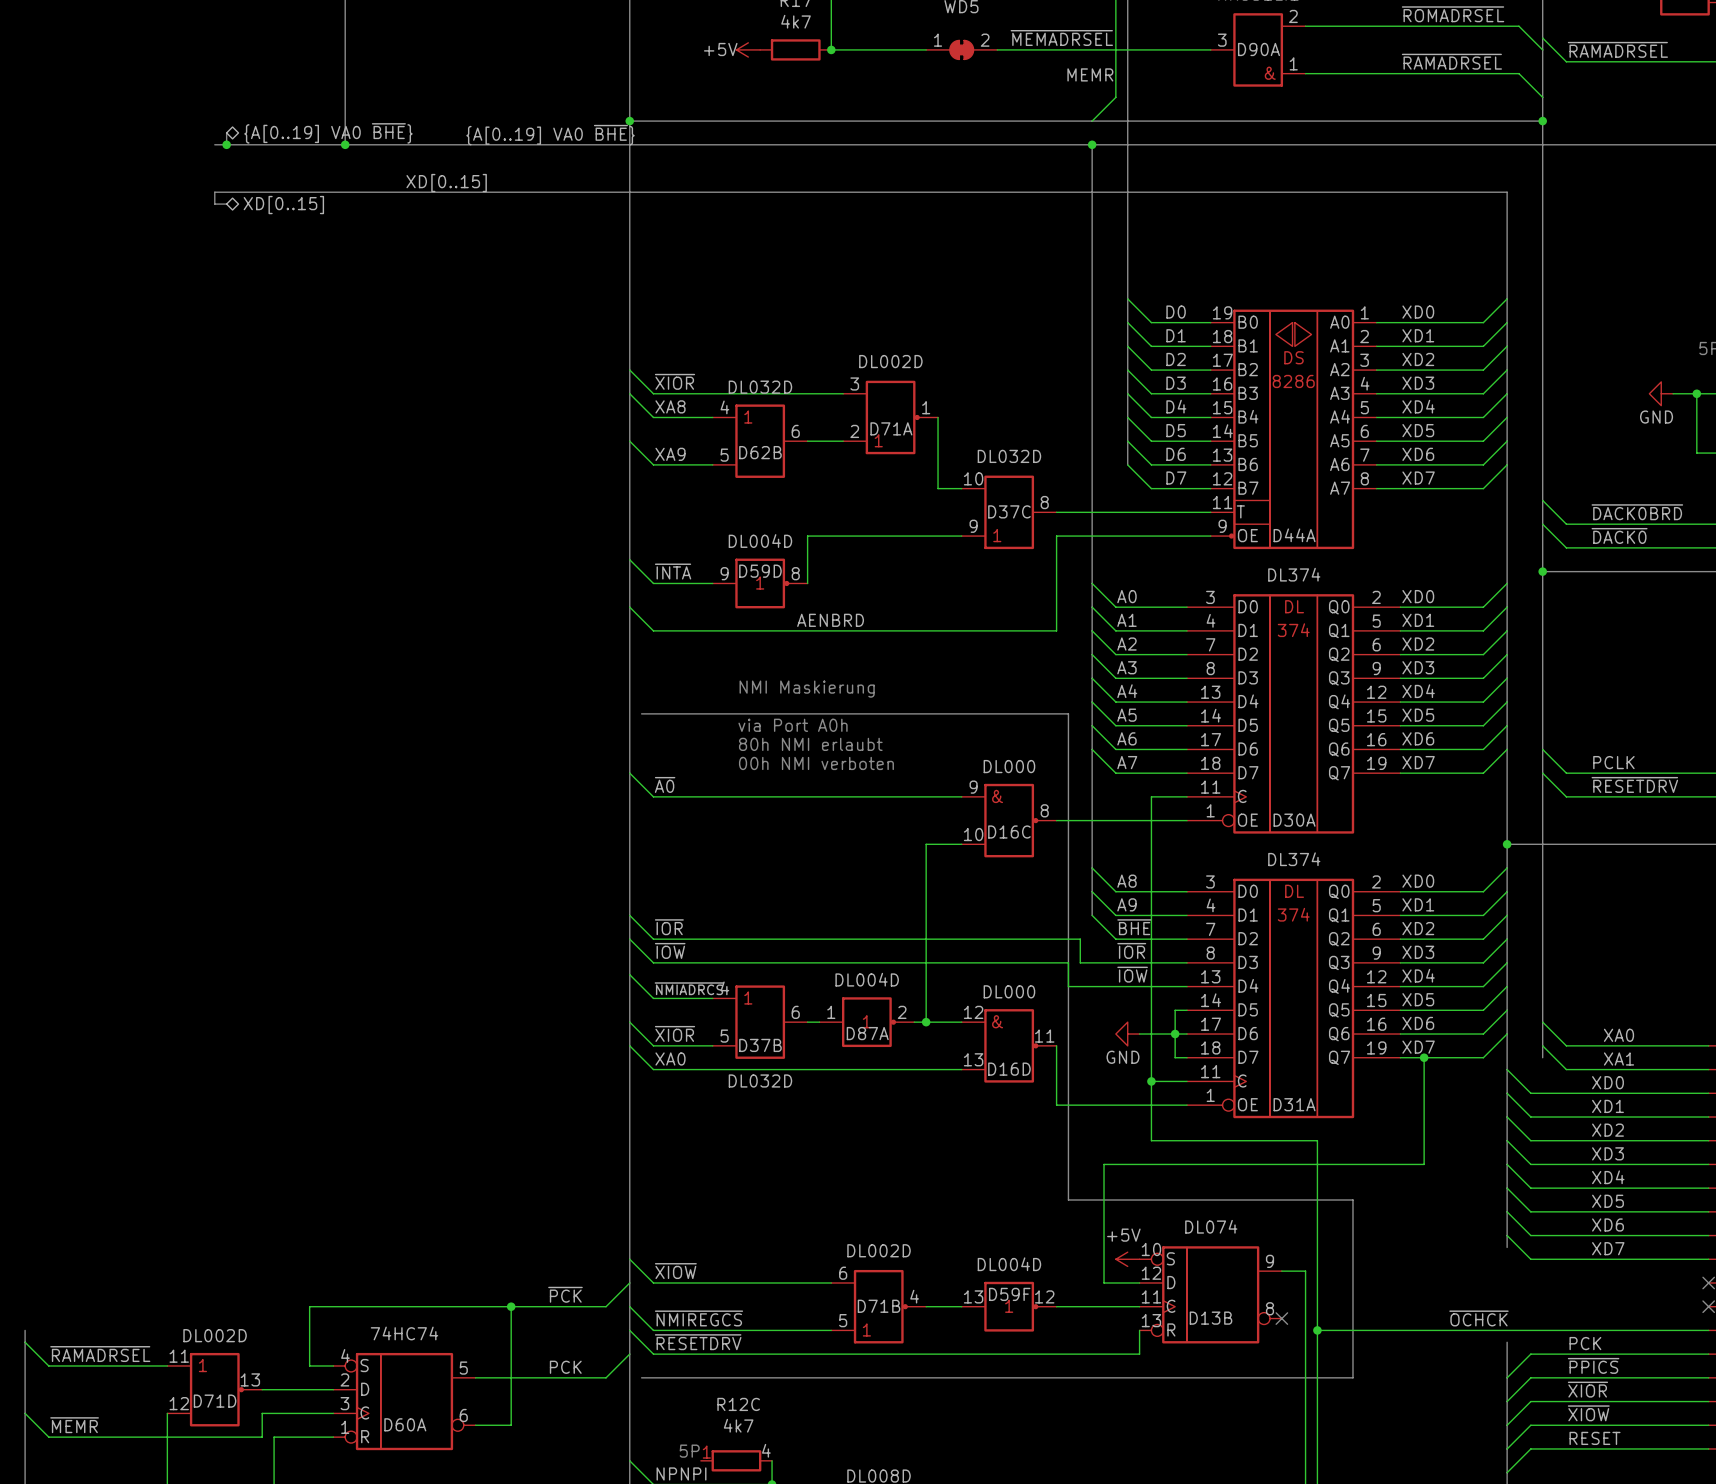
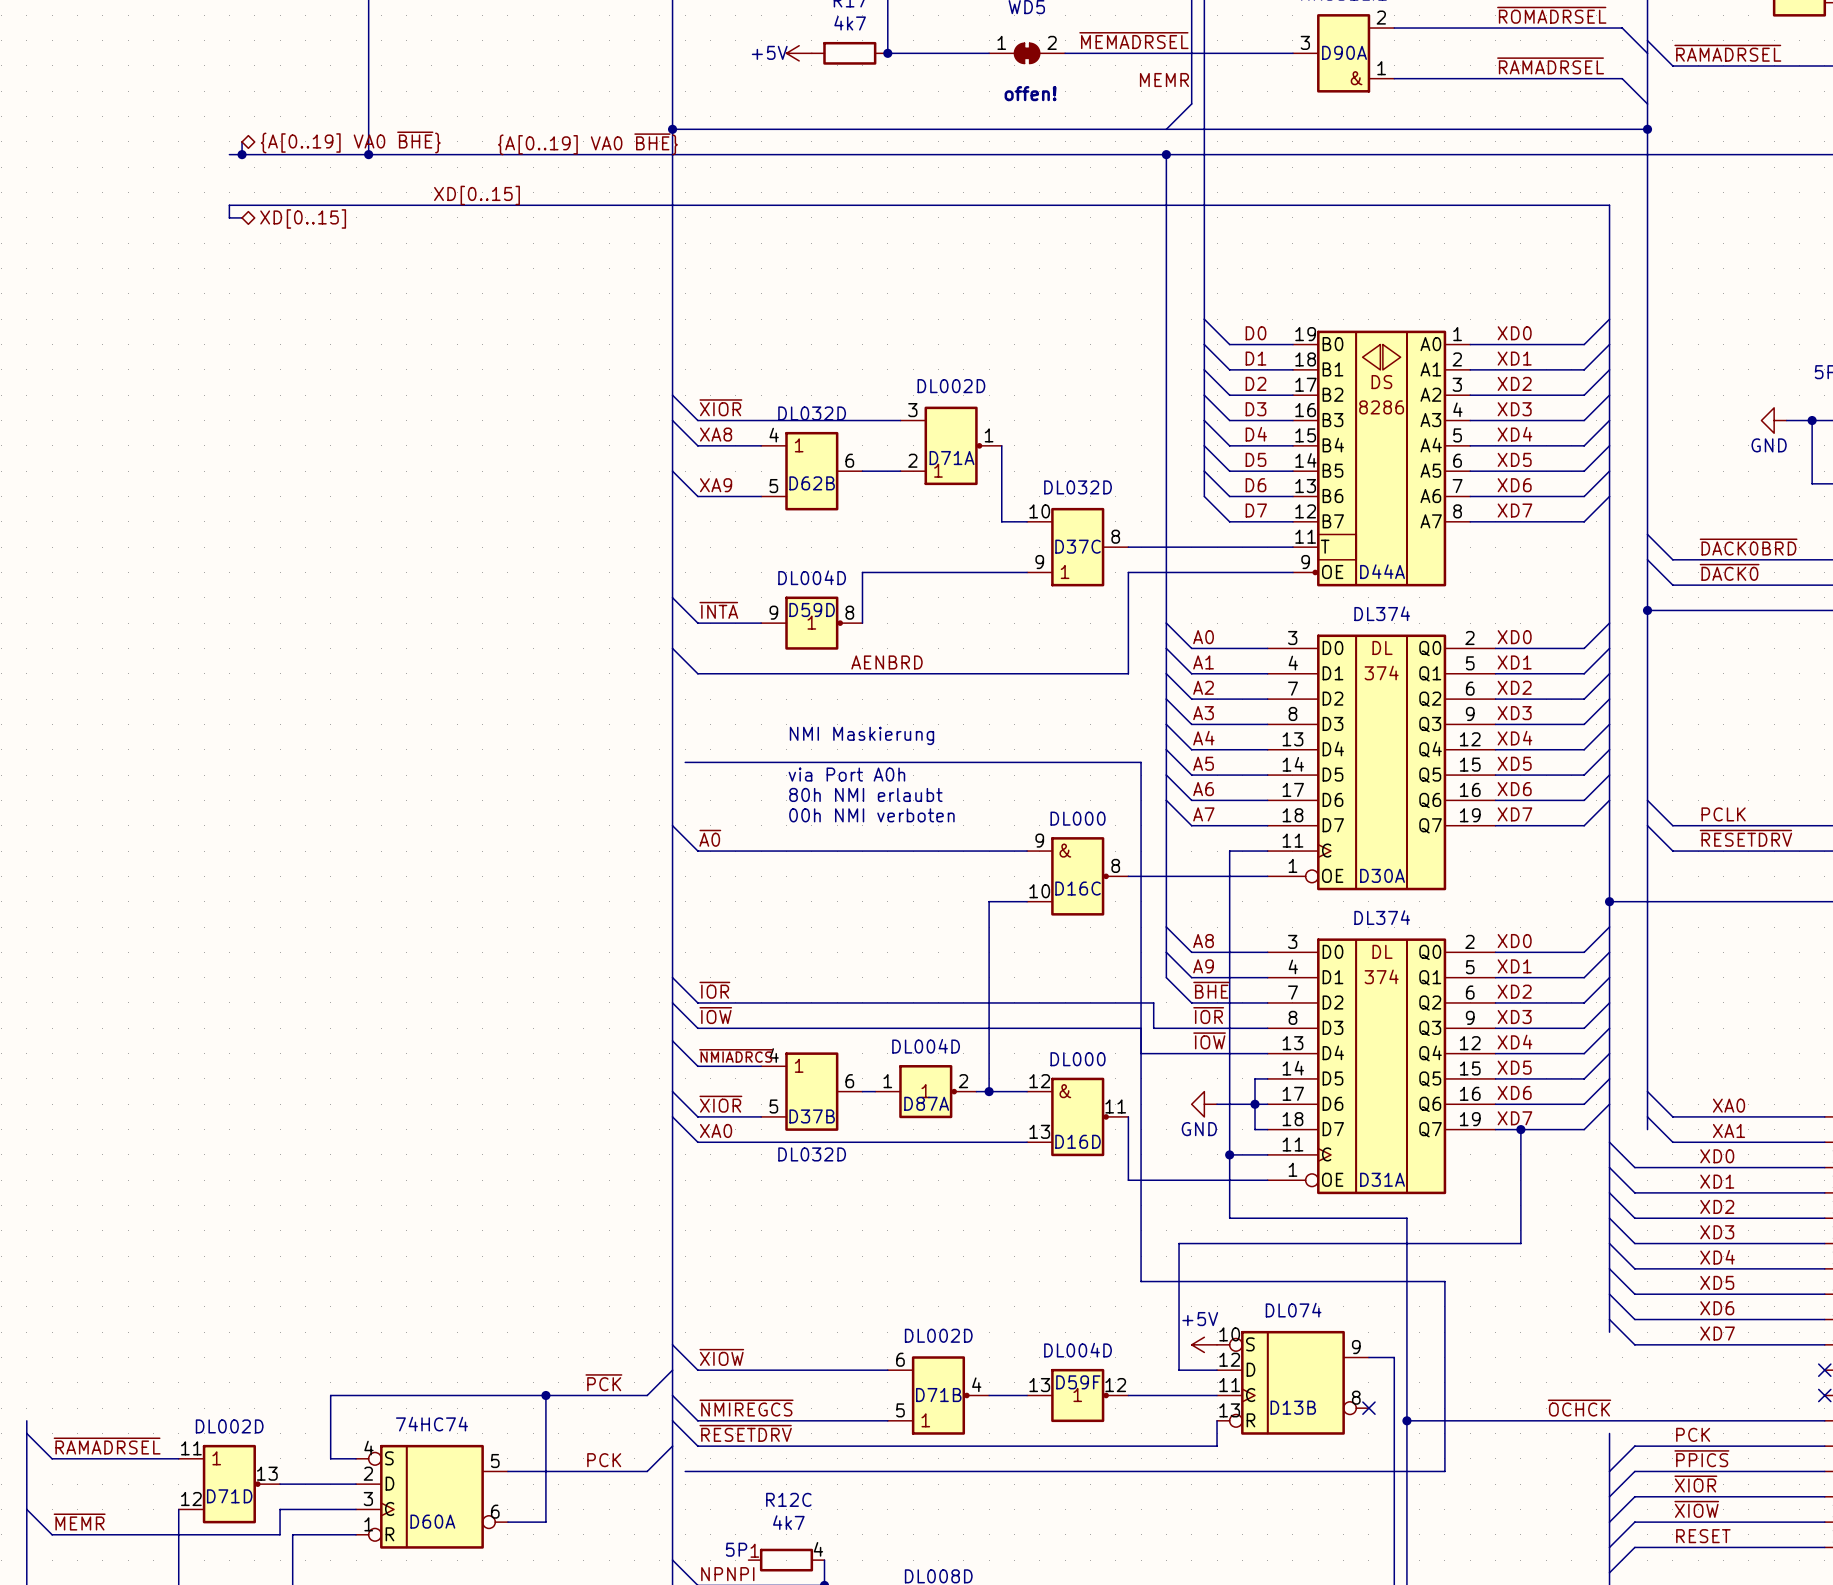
text: none -> offen! (1030, 93)

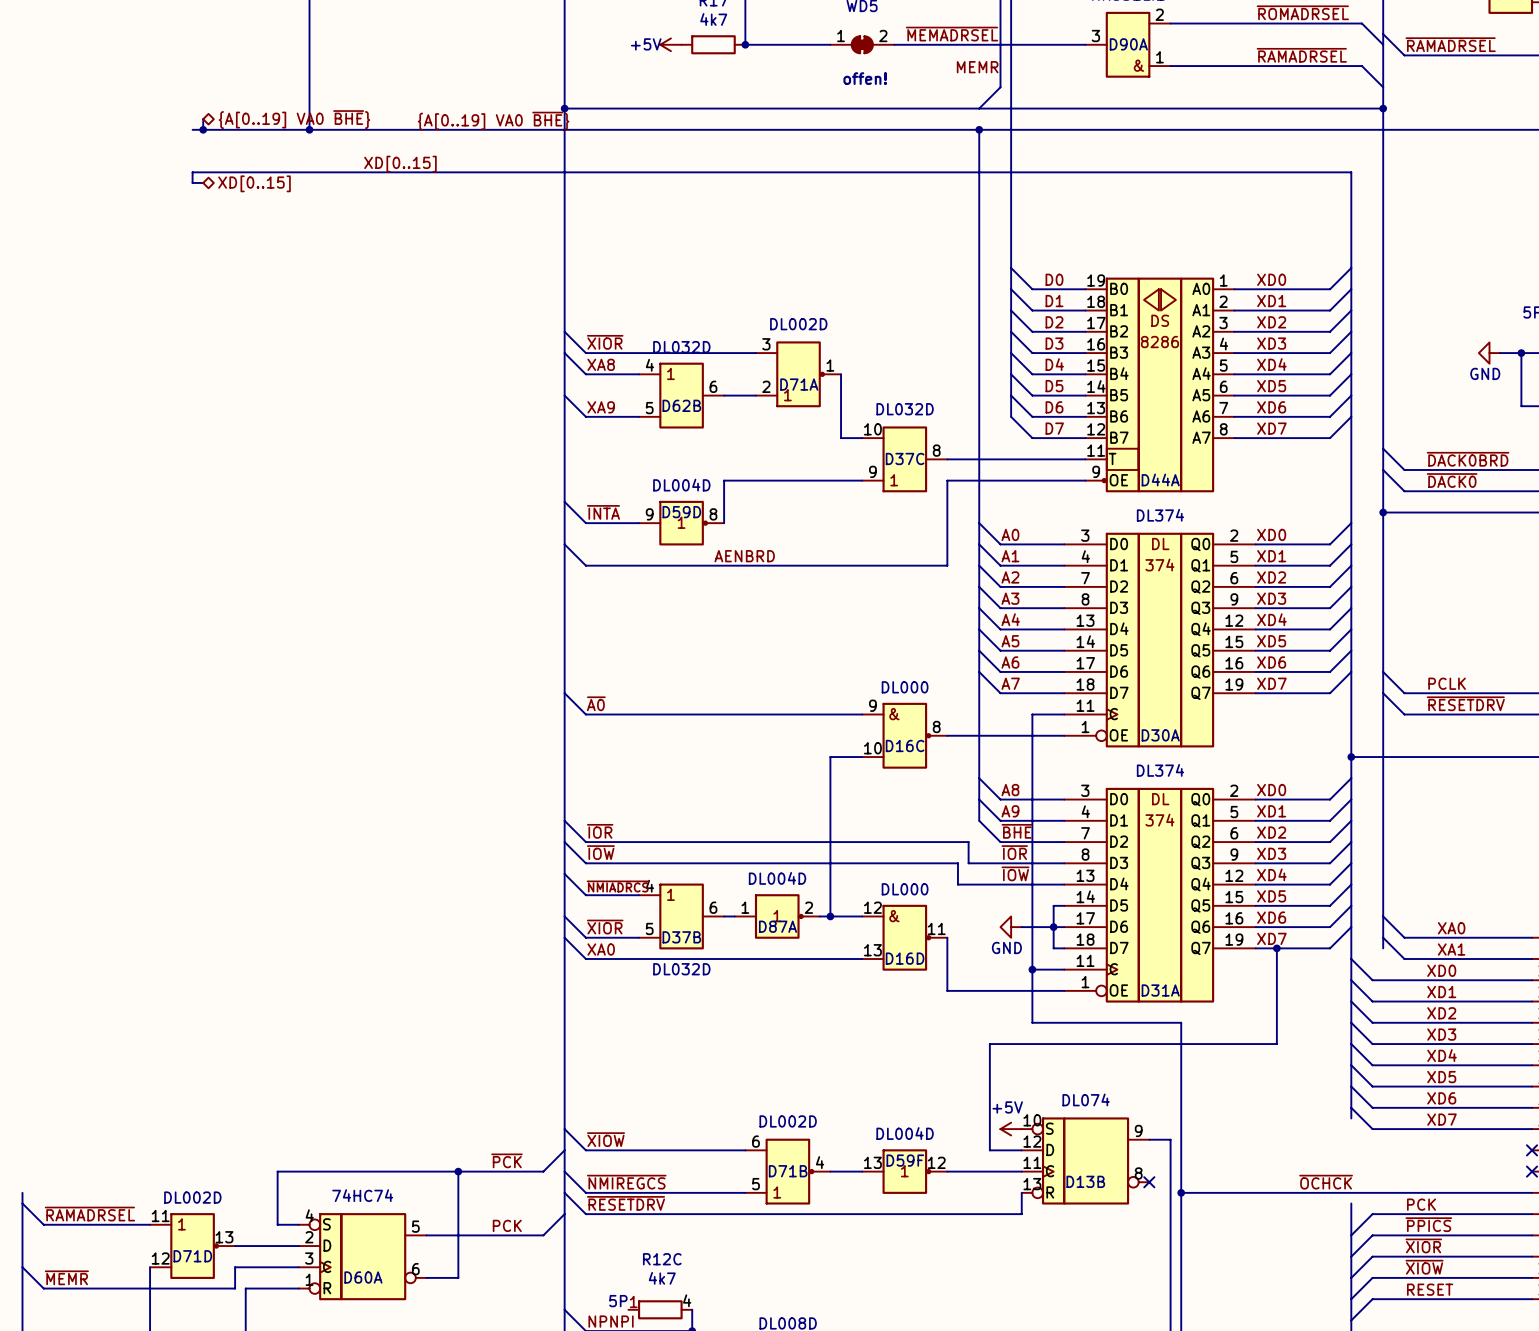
text: NMI Maskierung (861, 735) -> none
line: (685, 762) (1141, 762) (1141, 1281) (1444, 1281) (1444, 1471) (685, 1471) -> none
text: via Port A0h (846, 774) -> none
text: 80h NMI erlaubt (865, 794) -> none
text: 00h NMI verboten (871, 815) -> none

